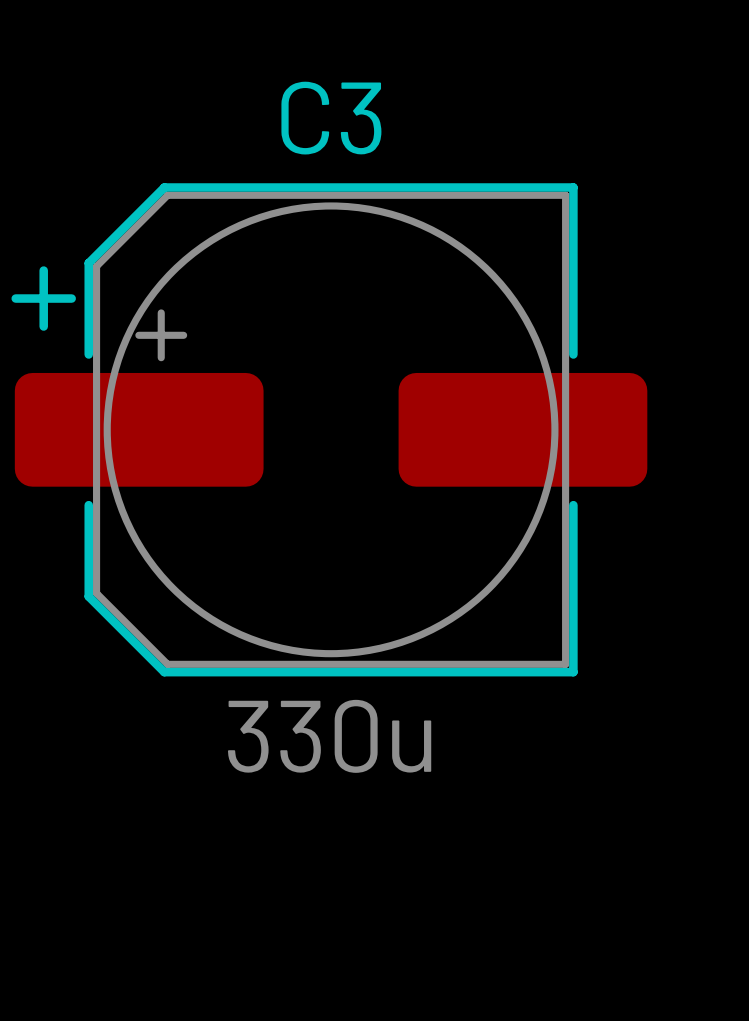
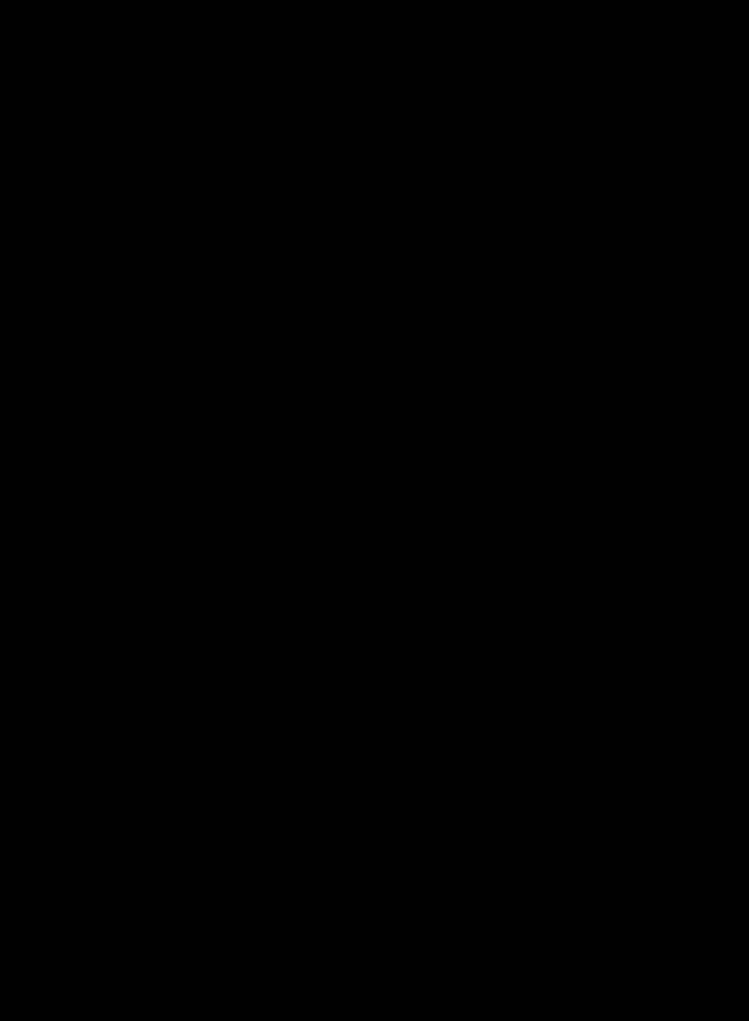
C3: 330u (329, 429) -> none

